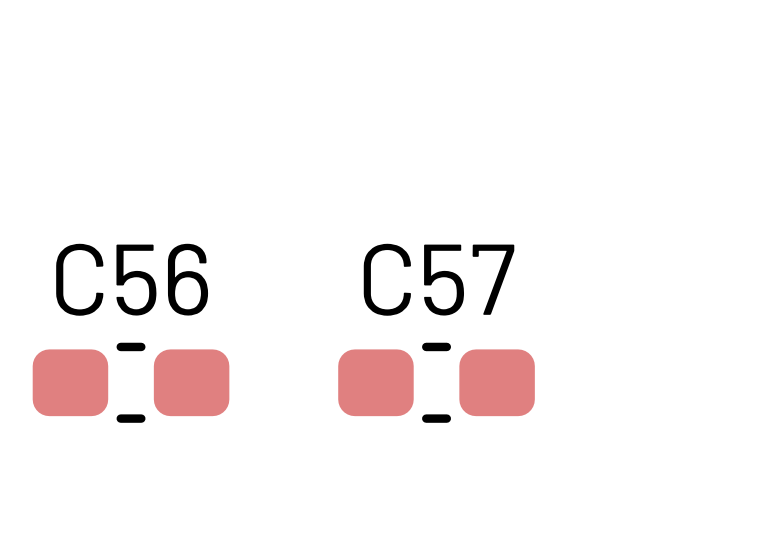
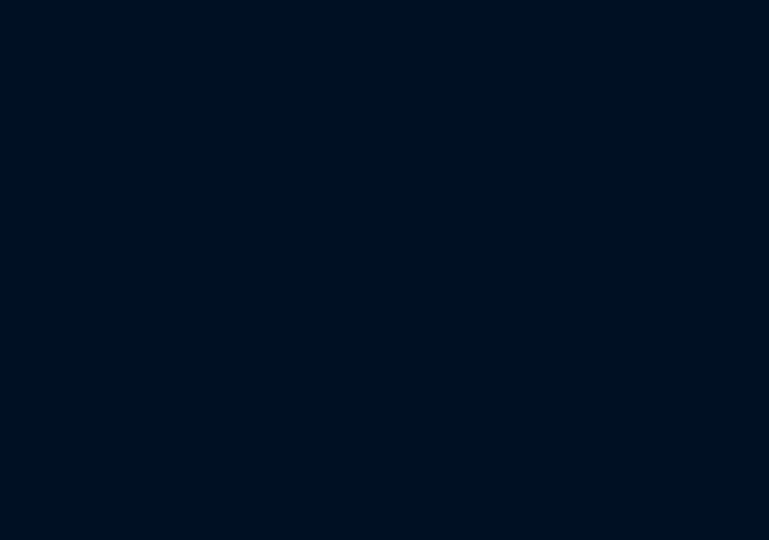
C56: (131, 382) -> none
C57: (436, 382) -> none

